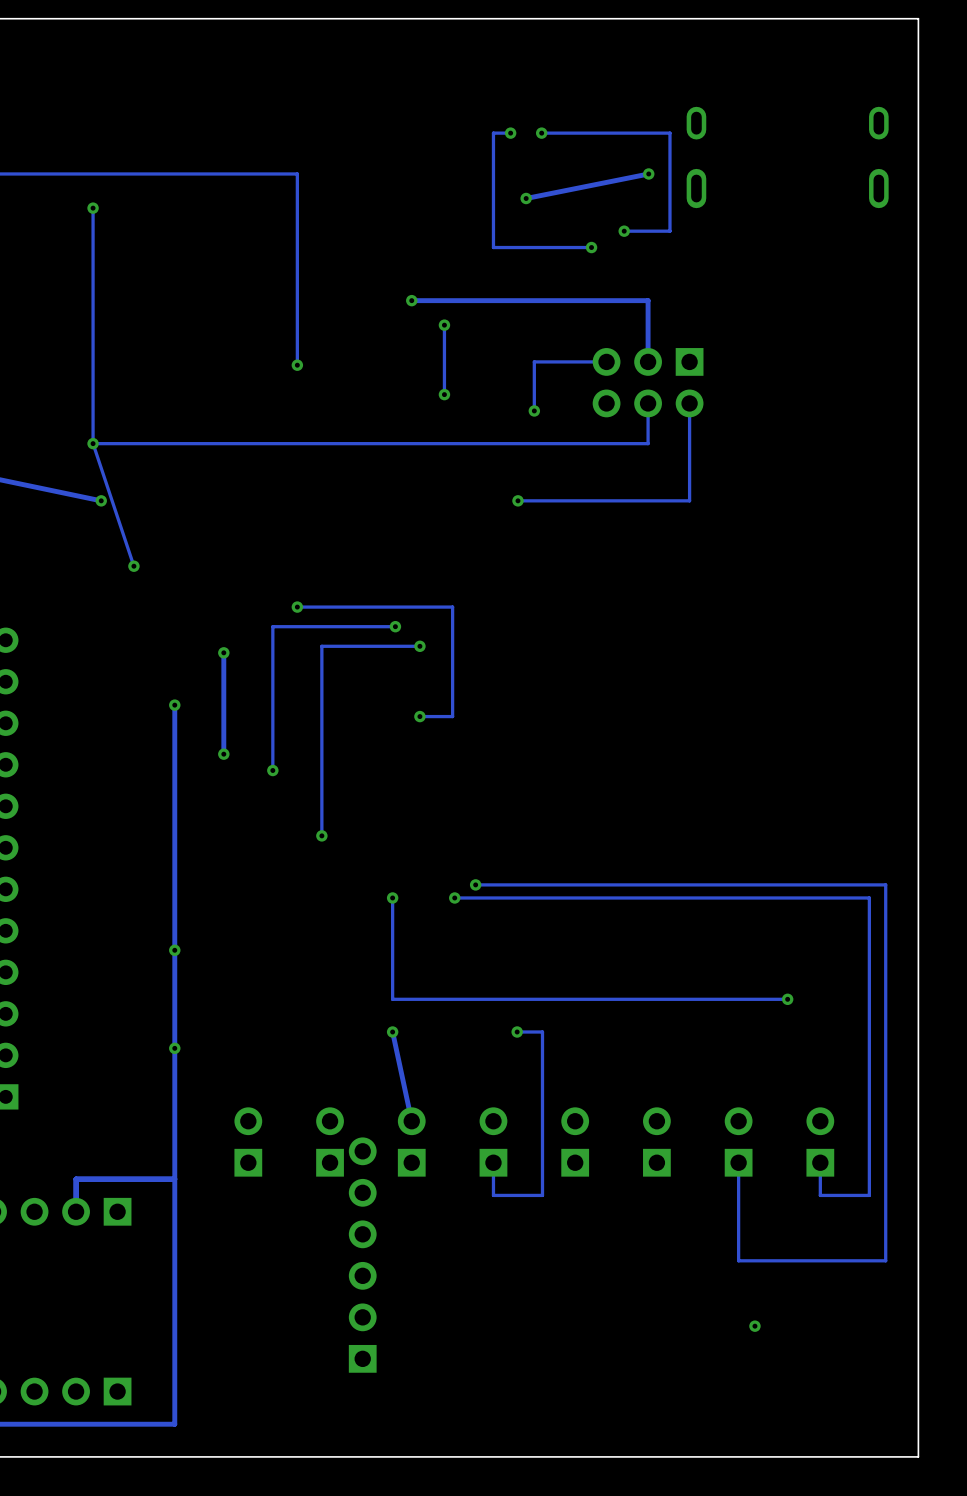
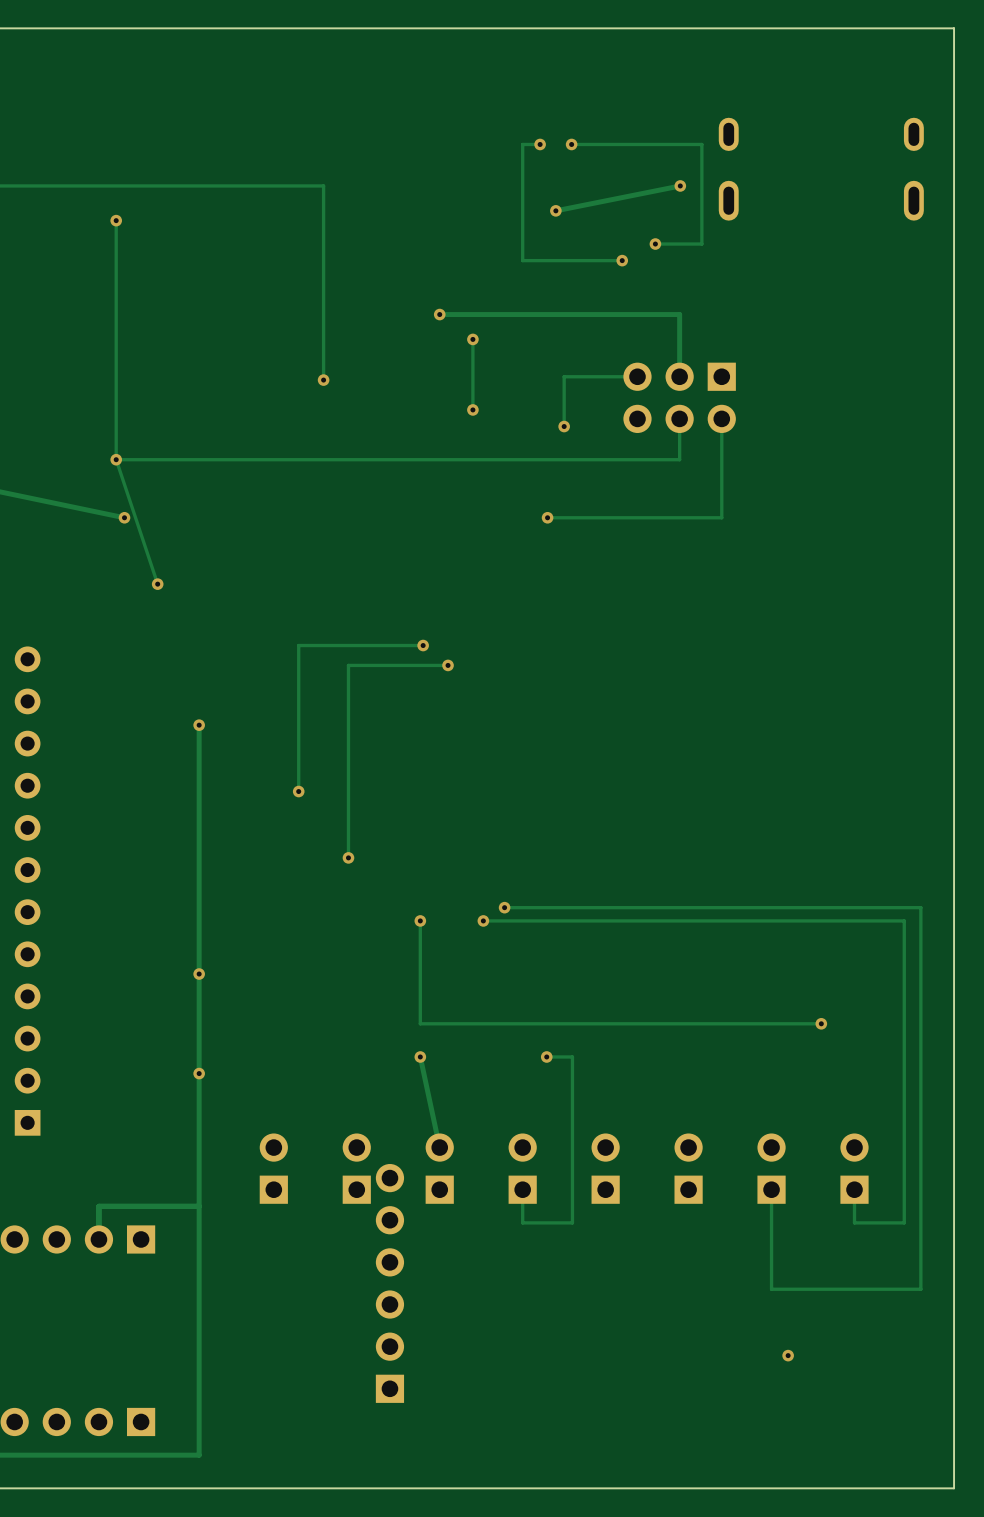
track: (297, 607) (452, 607) (452, 716) (419, 716) -> none
via: (297, 607) -> none
track: (223, 652) (223, 754) -> none
via: (223, 652) -> none
via: (419, 716) -> none
via: (223, 754) -> none

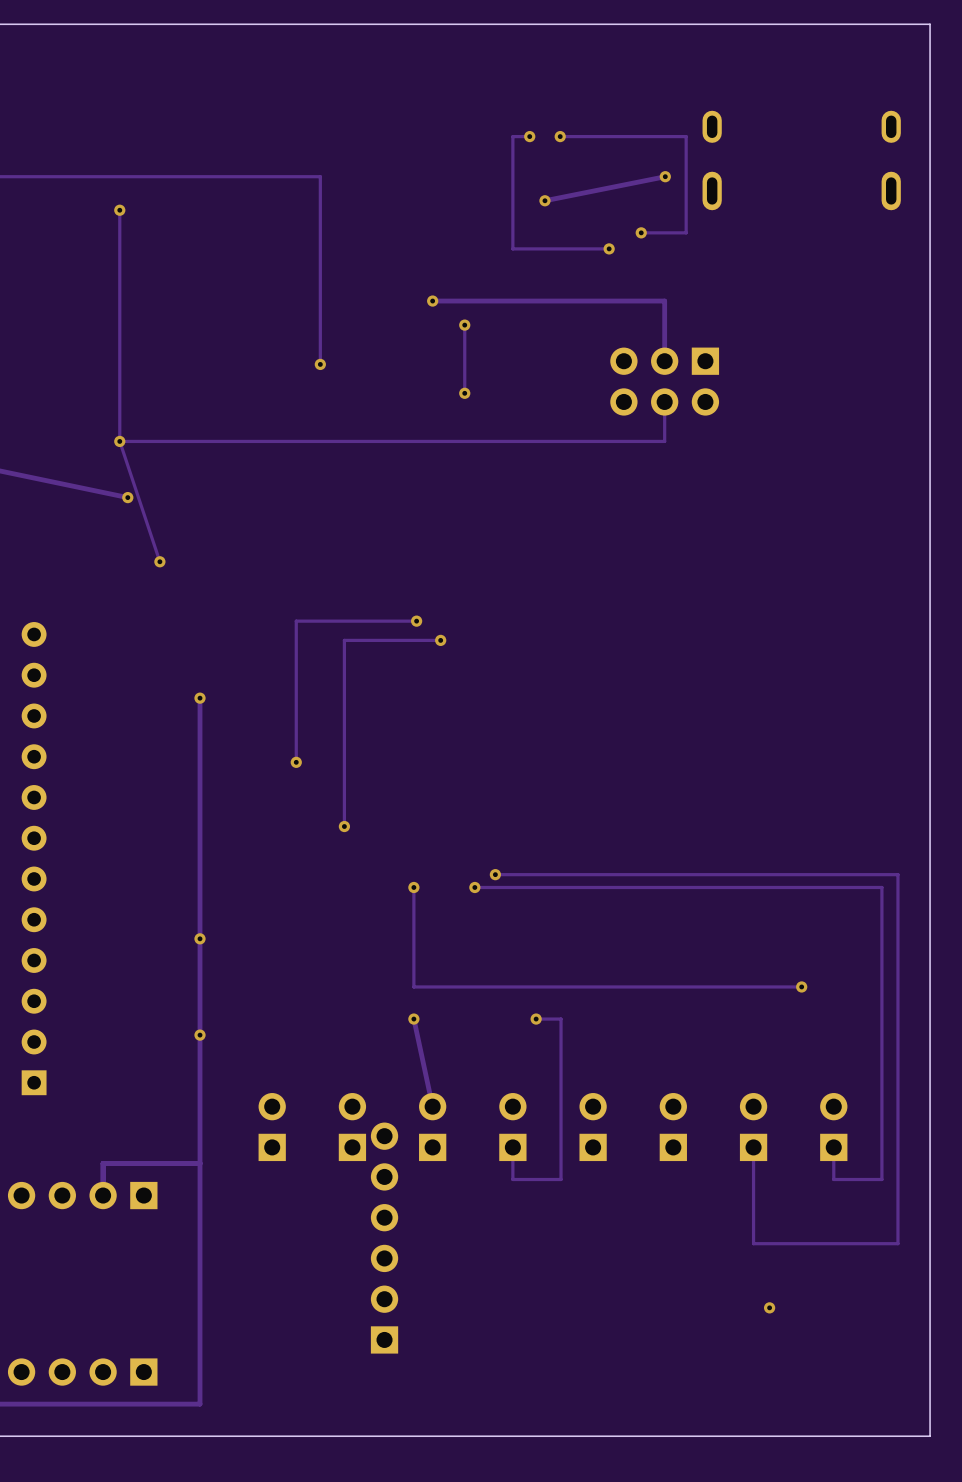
track: (637, 376) (564, 376) (564, 426) -> none
track: (721, 418) (721, 517) (547, 517) -> none
via: (564, 426) -> none
via: (547, 517) -> none

